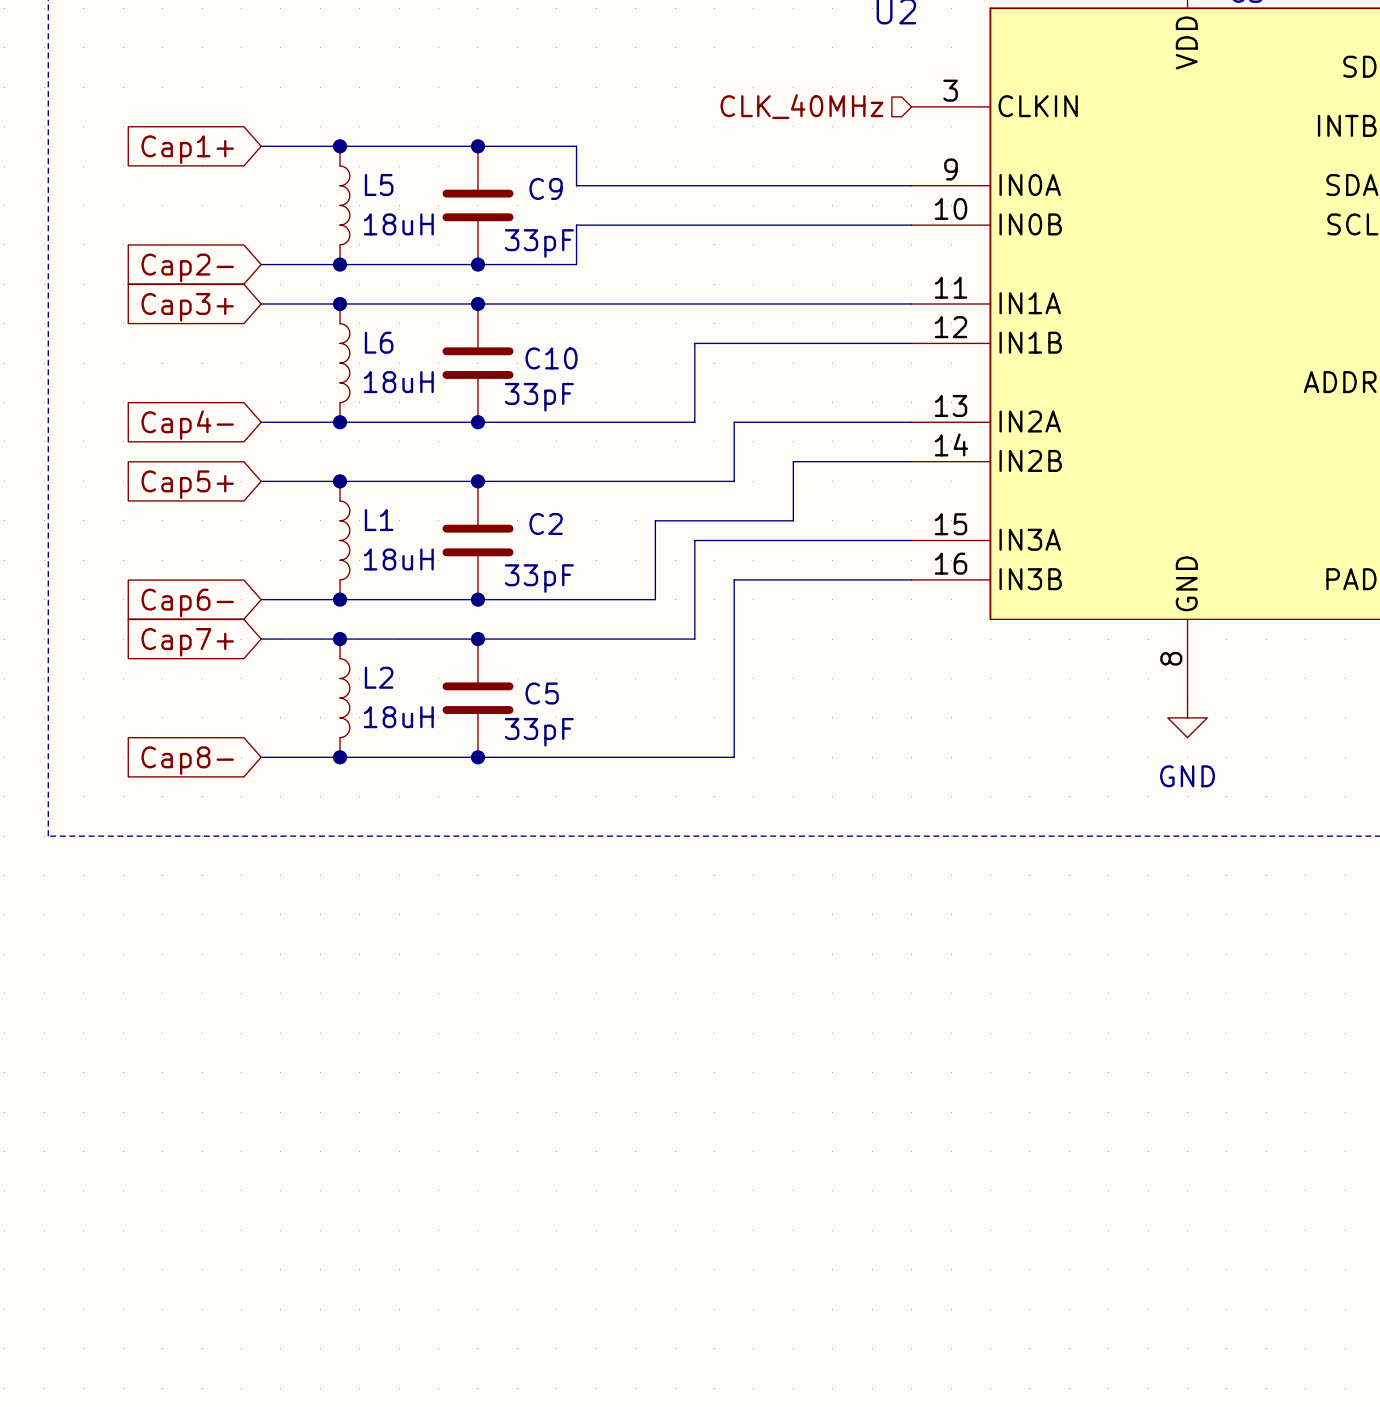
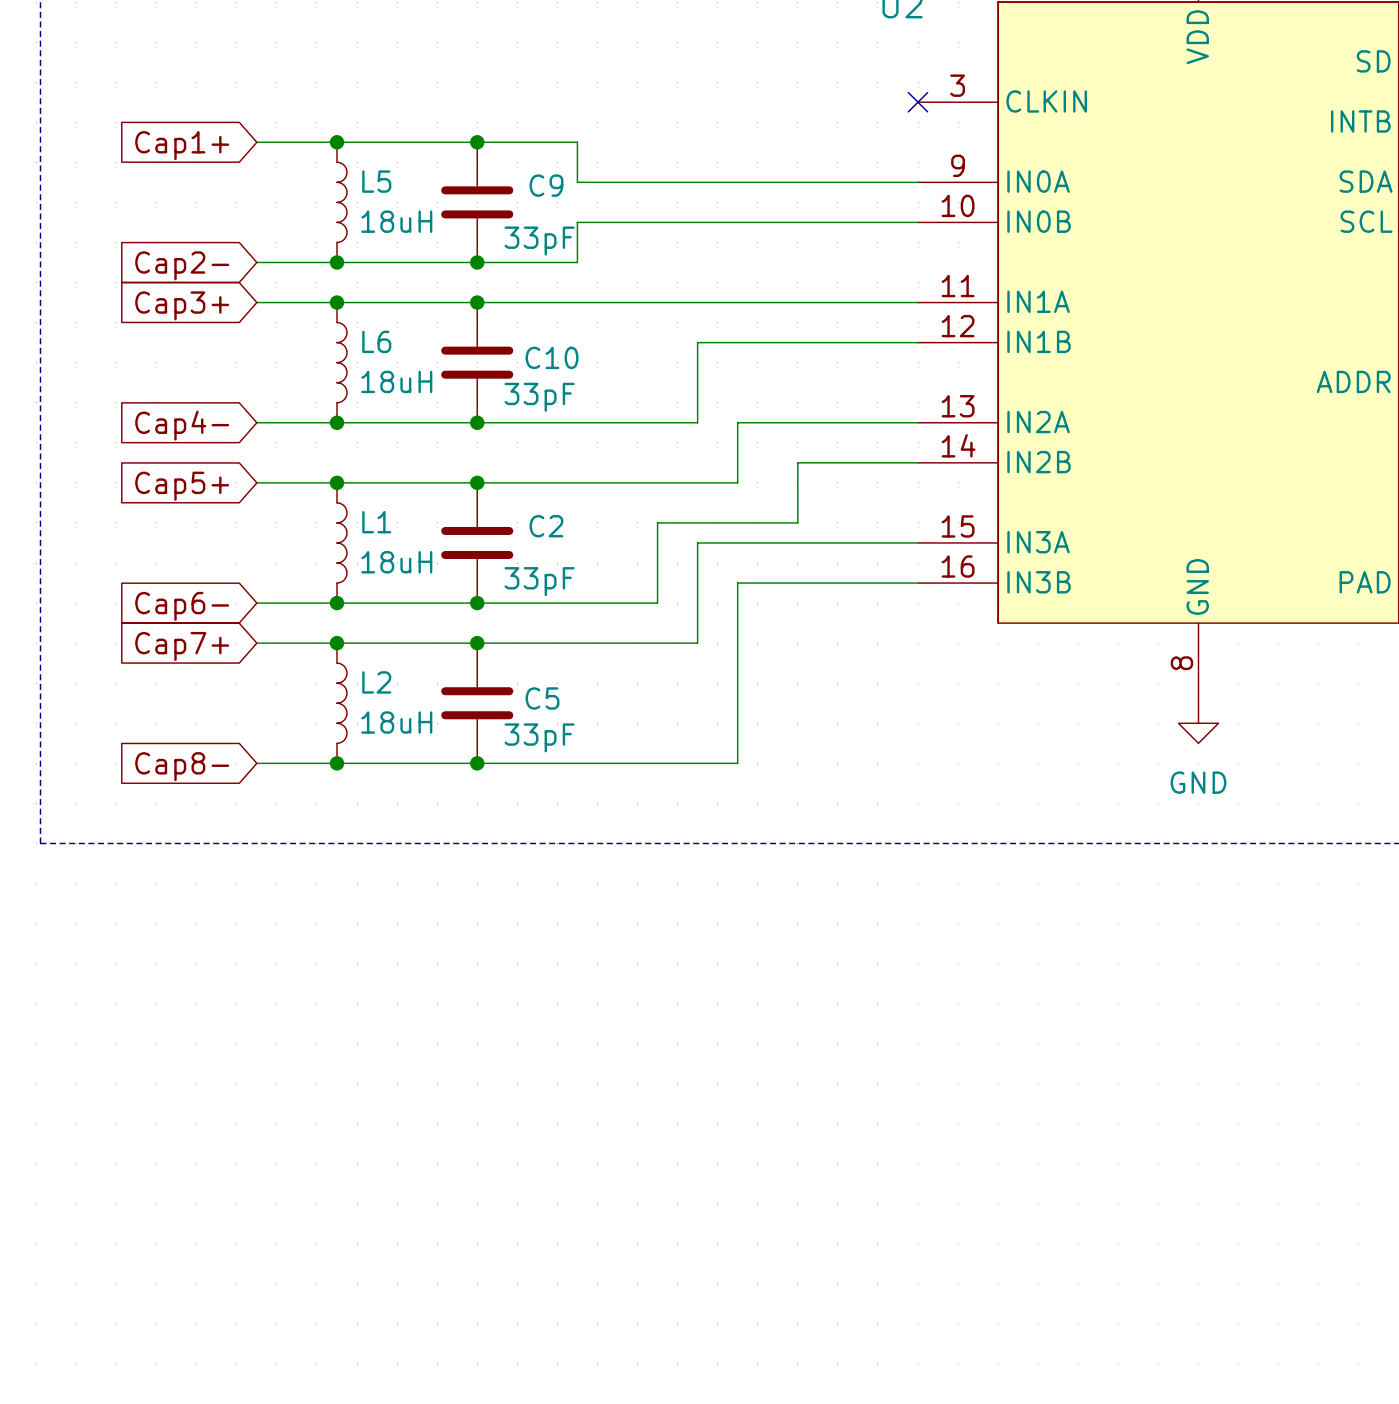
hierarchical label: CLK_40MHz (801, 106) -> none
no-connect mark: none -> (918, 102)

